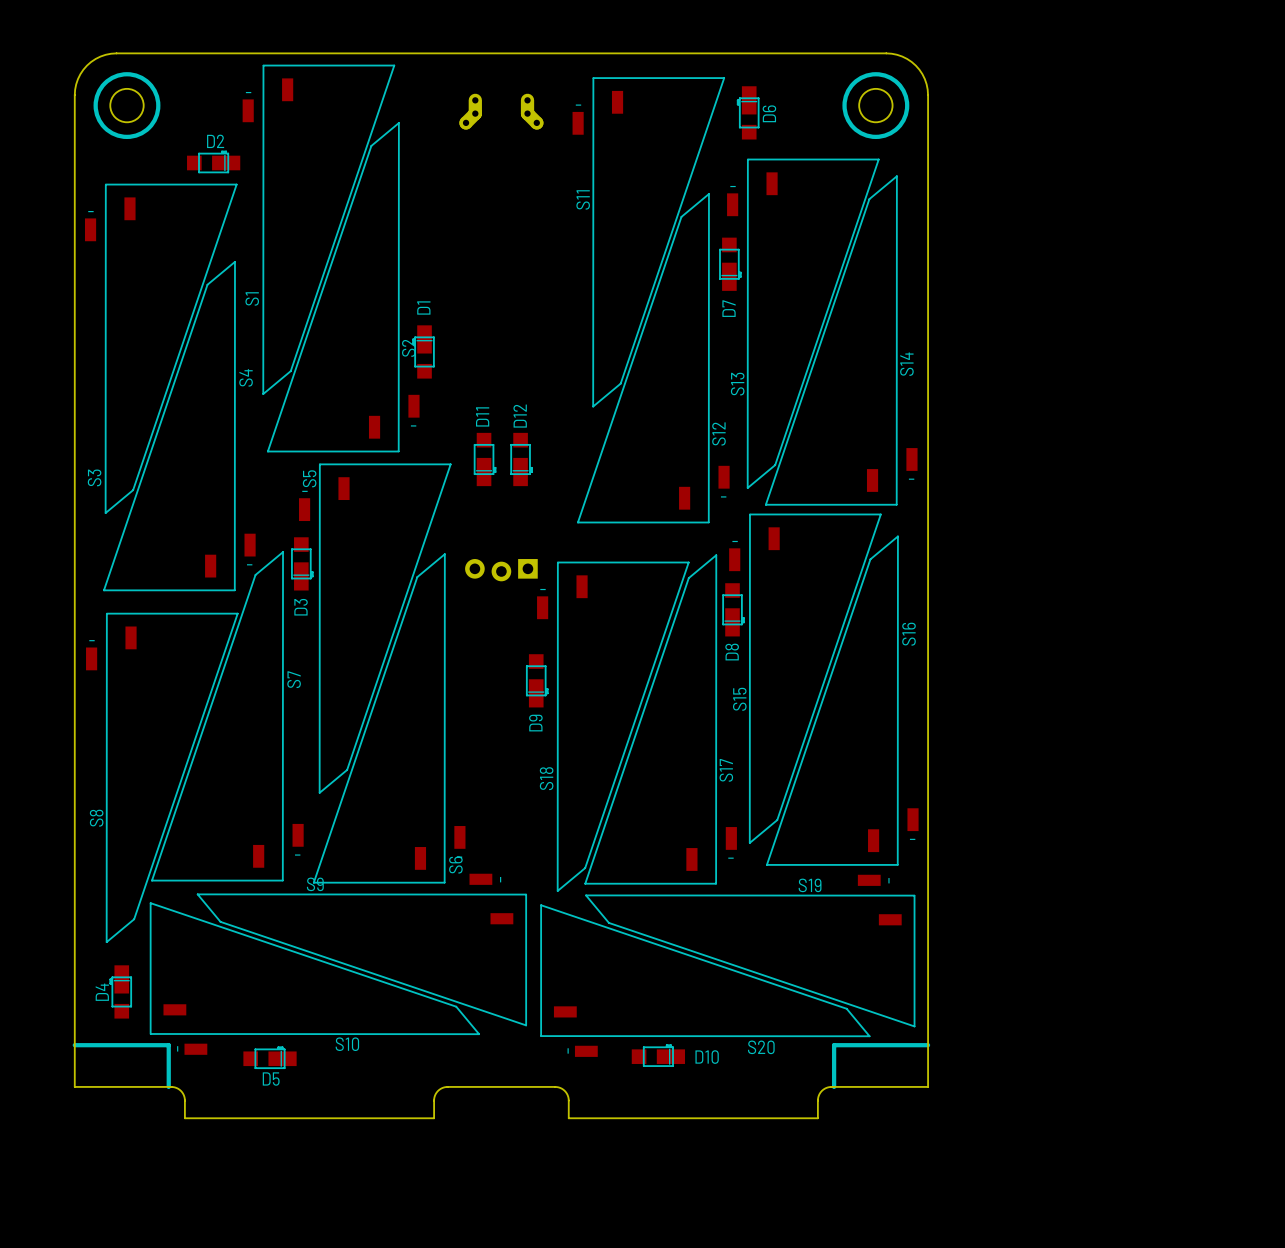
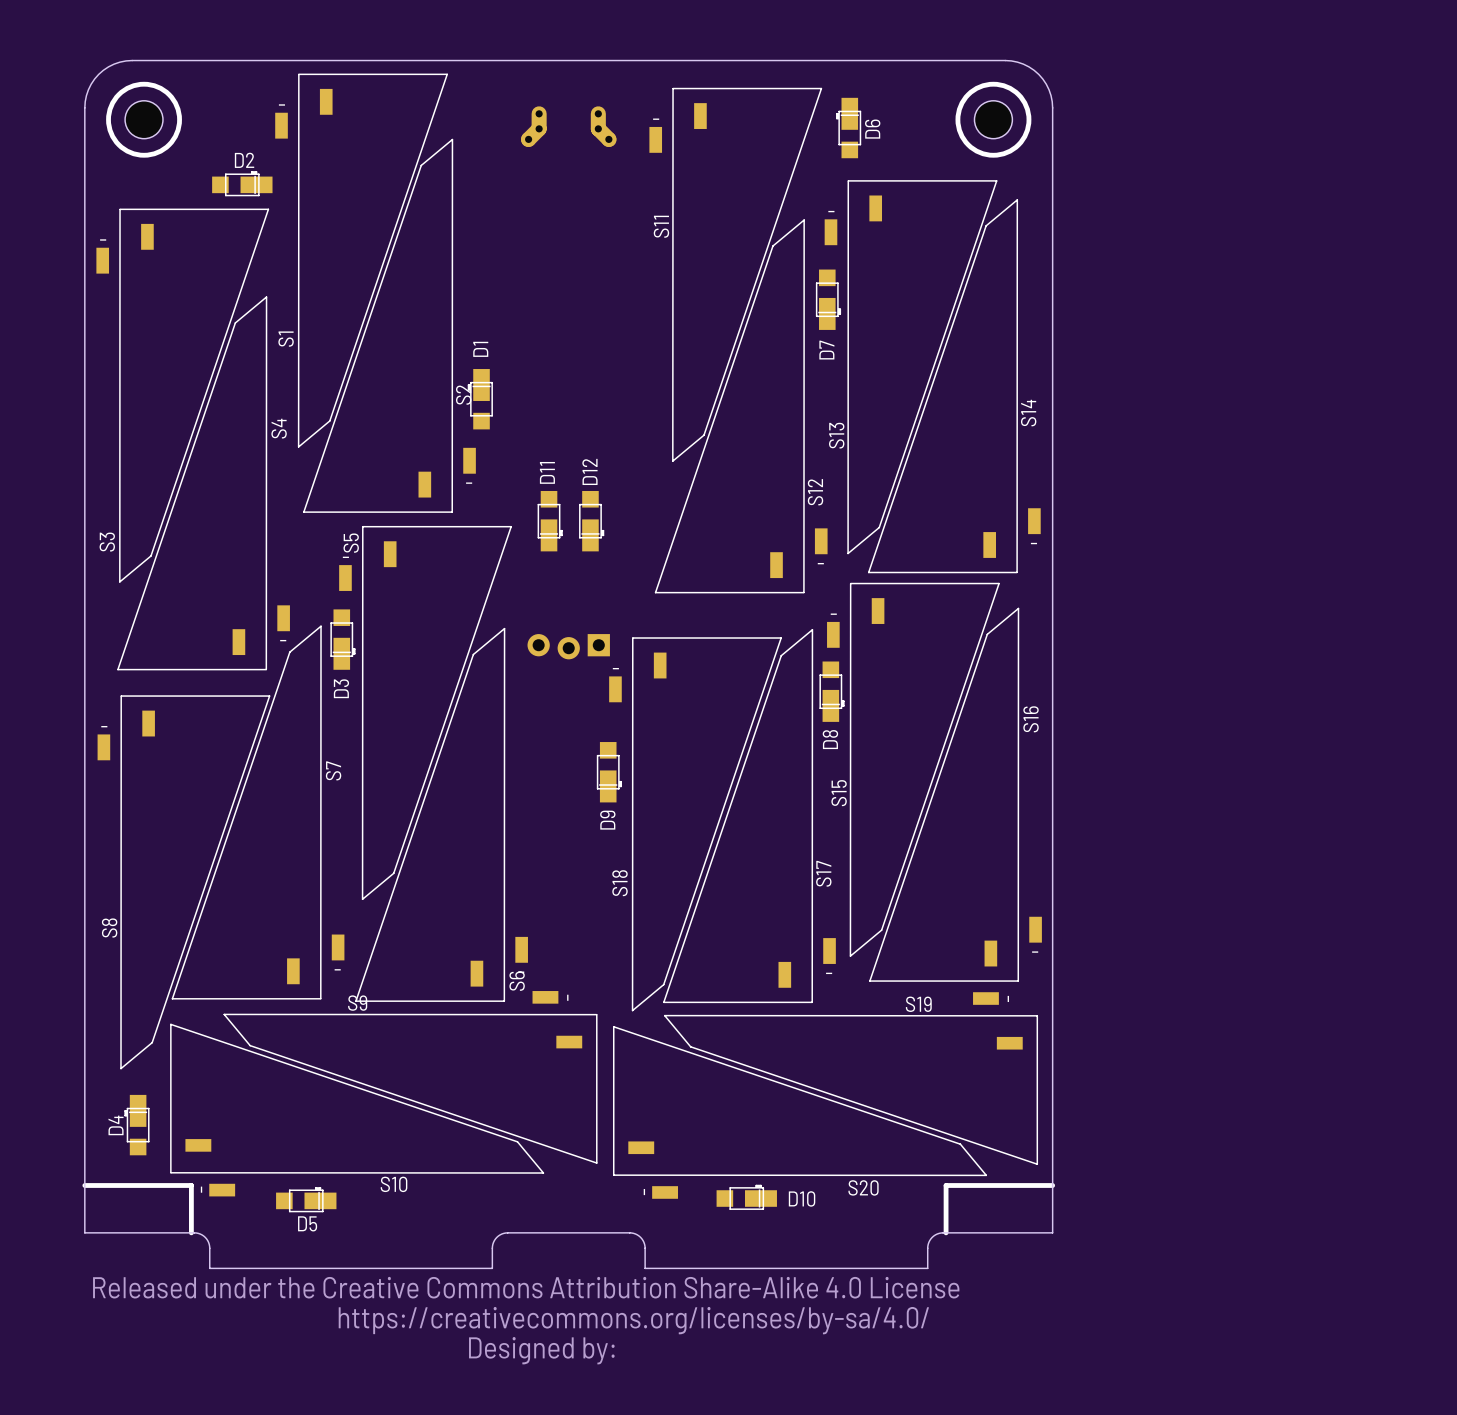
drawing: none -> [93, 1276, 960, 1365]

